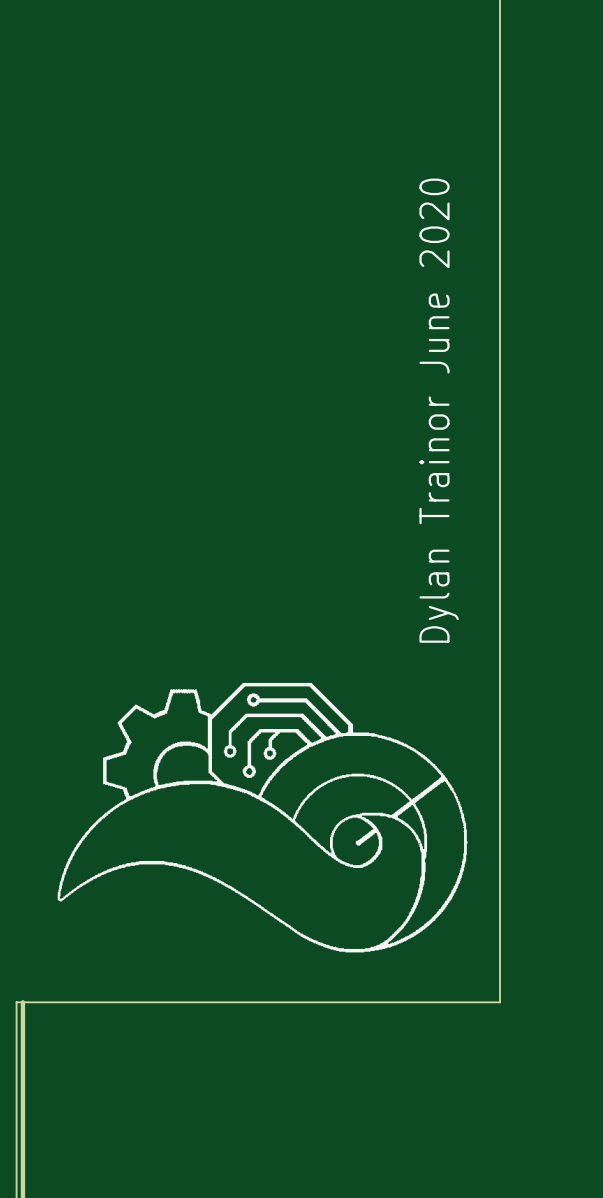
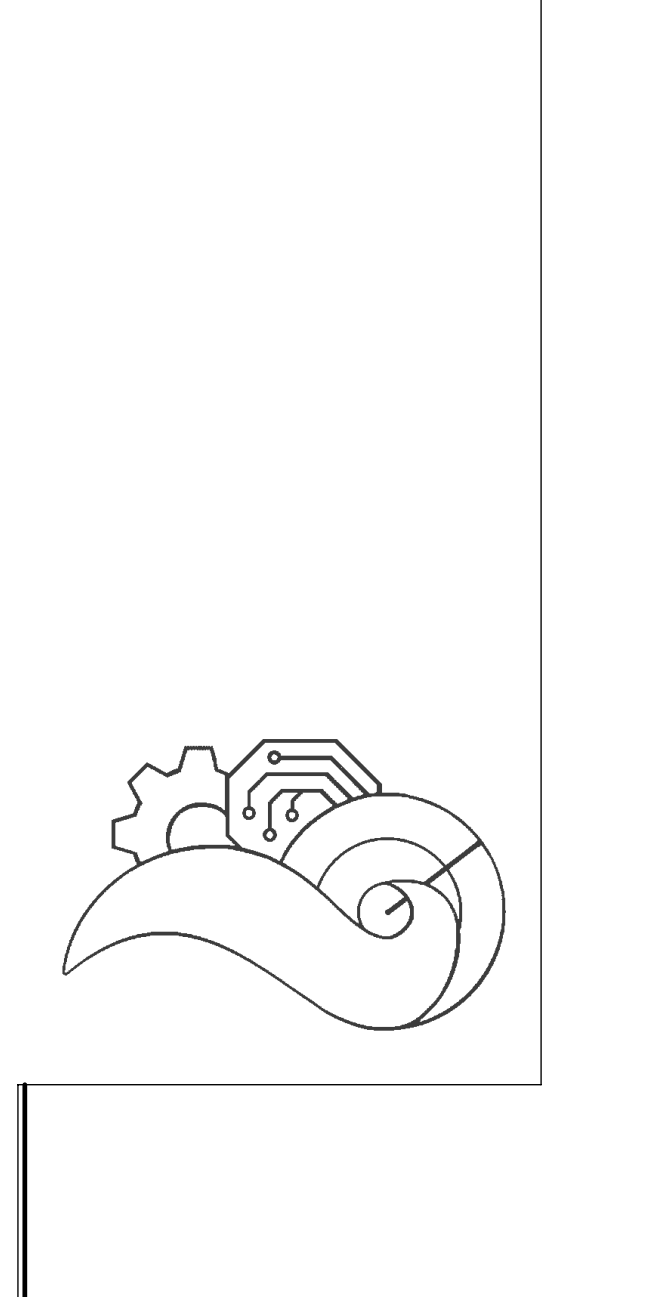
text: Dylan Trainor June 2020 (439, 410) -> none

